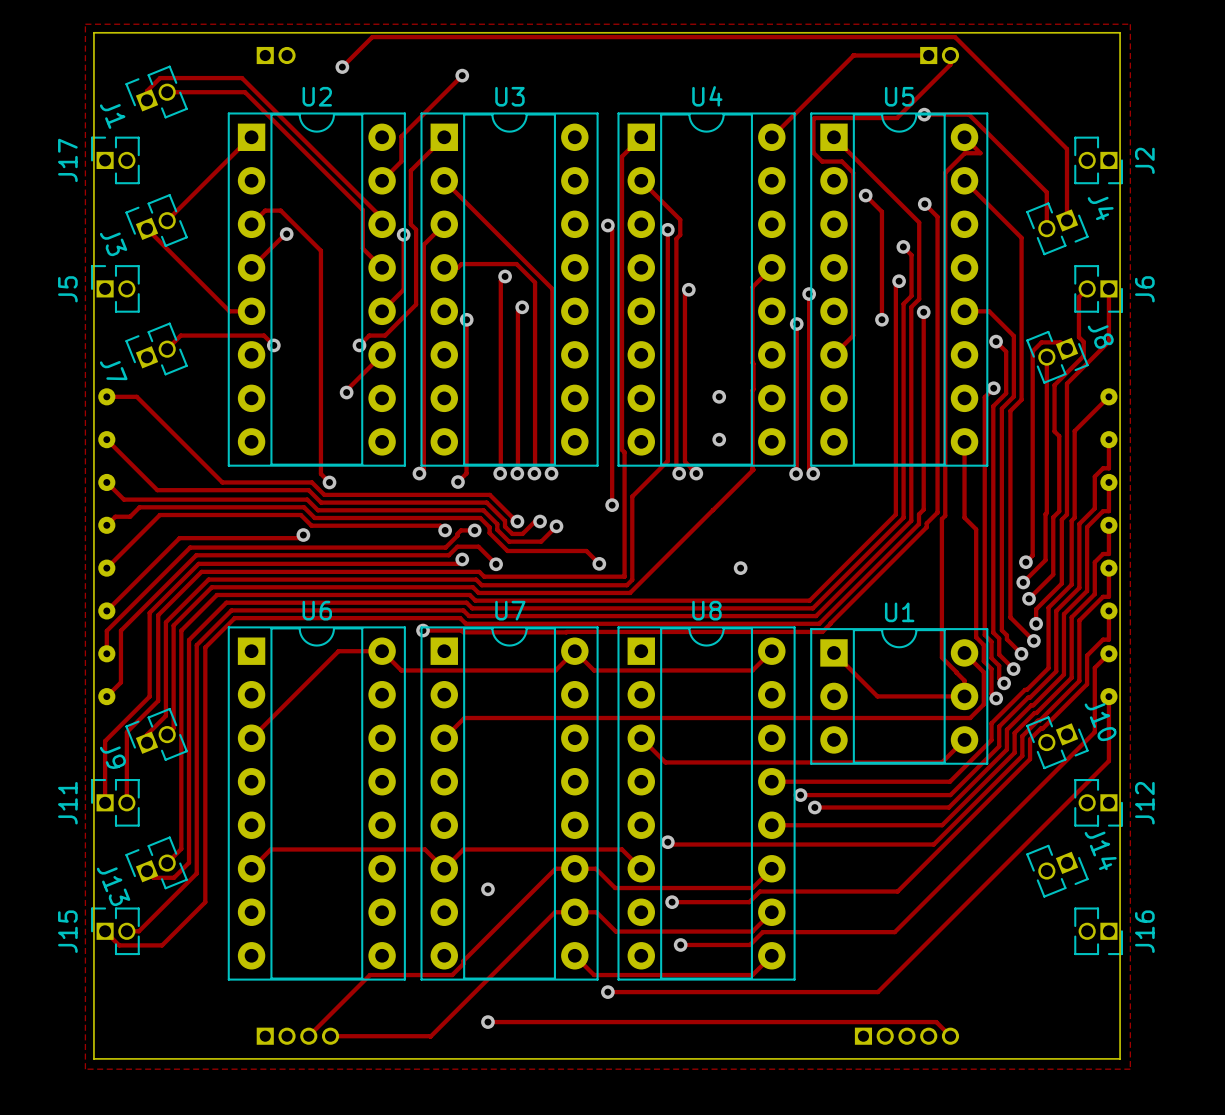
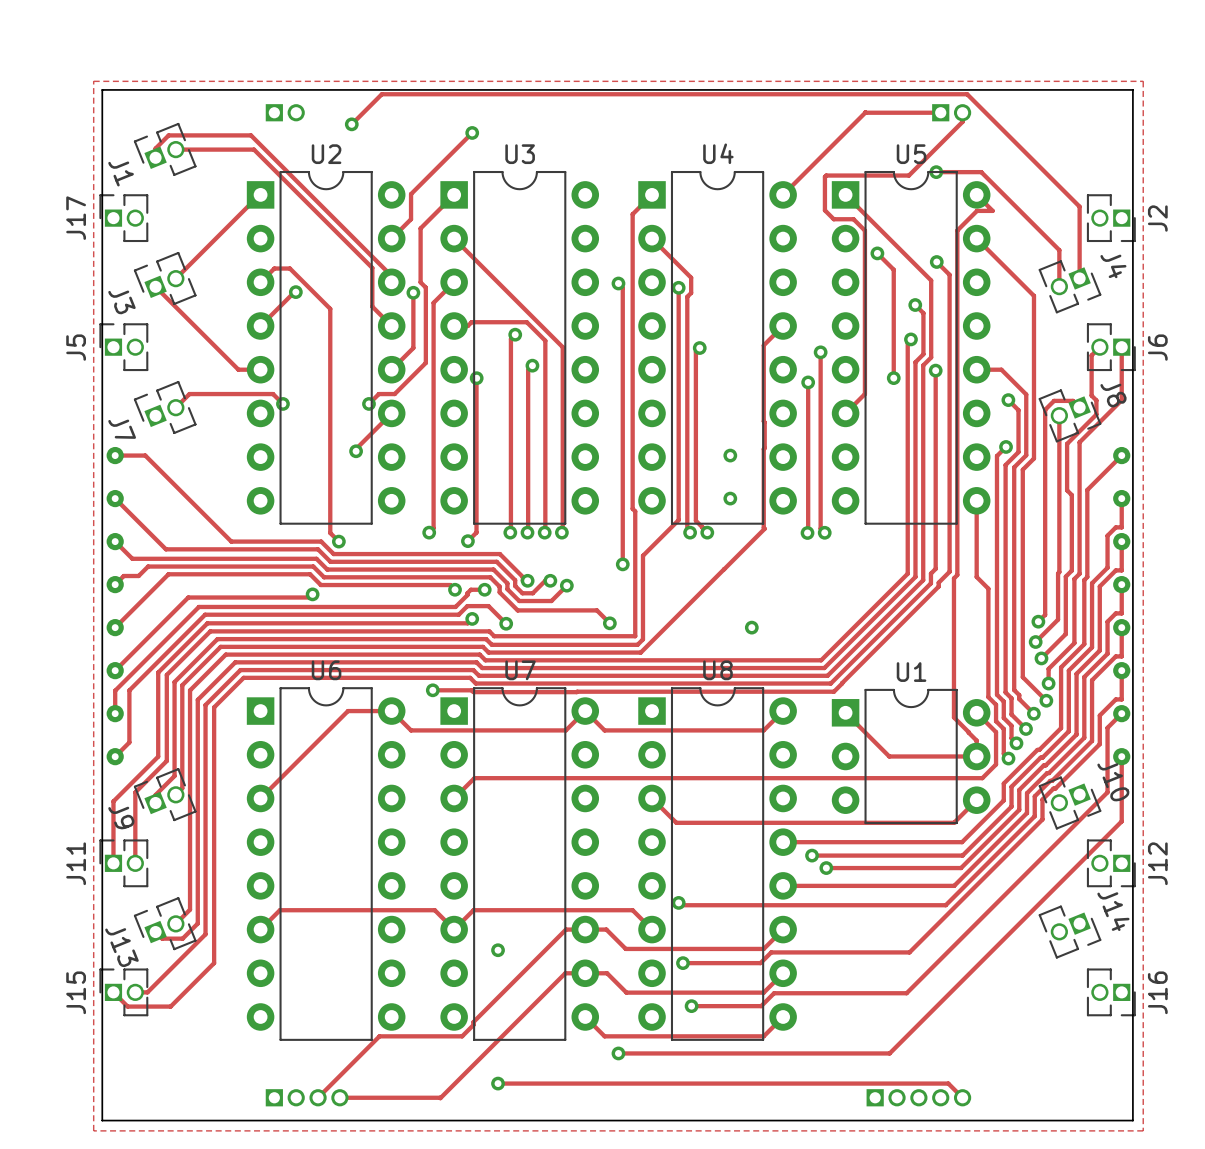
U2 footprint: [227, 112, 406, 467] -> [246, 170, 406, 525]
U3 footprint: [420, 112, 599, 467] -> [440, 170, 600, 525]
U4 footprint: [617, 112, 796, 467] -> [638, 170, 797, 525]
U5 footprint: [810, 112, 989, 467] -> [831, 170, 991, 525]
U6 footprint: [227, 626, 406, 981] -> [246, 687, 406, 1041]
U7 footprint: [420, 626, 599, 981] -> [440, 687, 600, 1041]
U8 footprint: [617, 626, 796, 981] -> [638, 687, 797, 1041]
U1 footprint: [810, 628, 989, 765] -> [831, 688, 991, 825]

